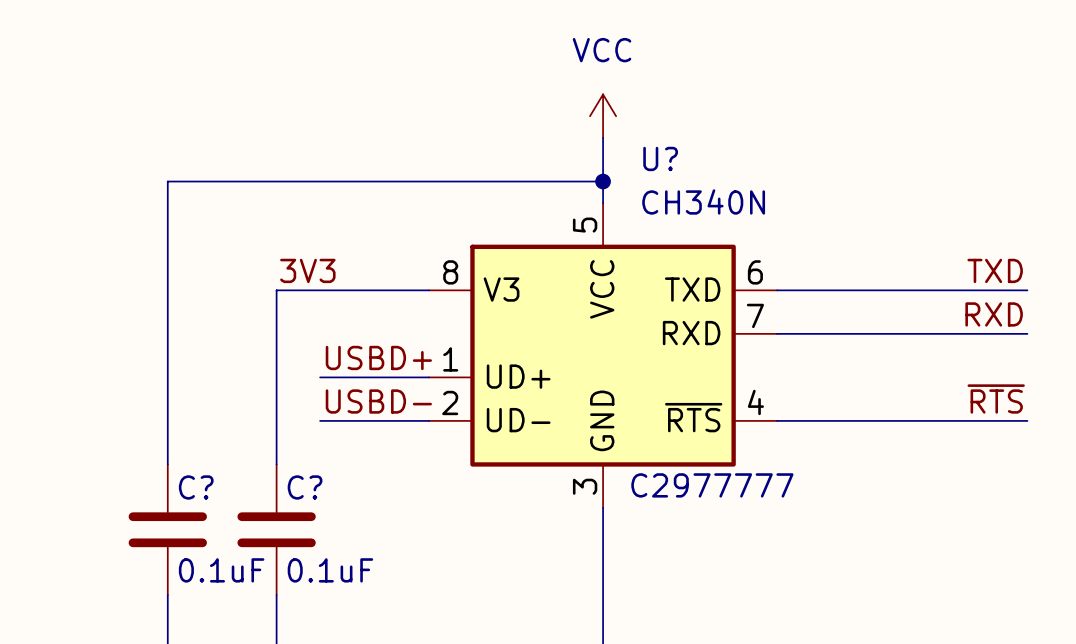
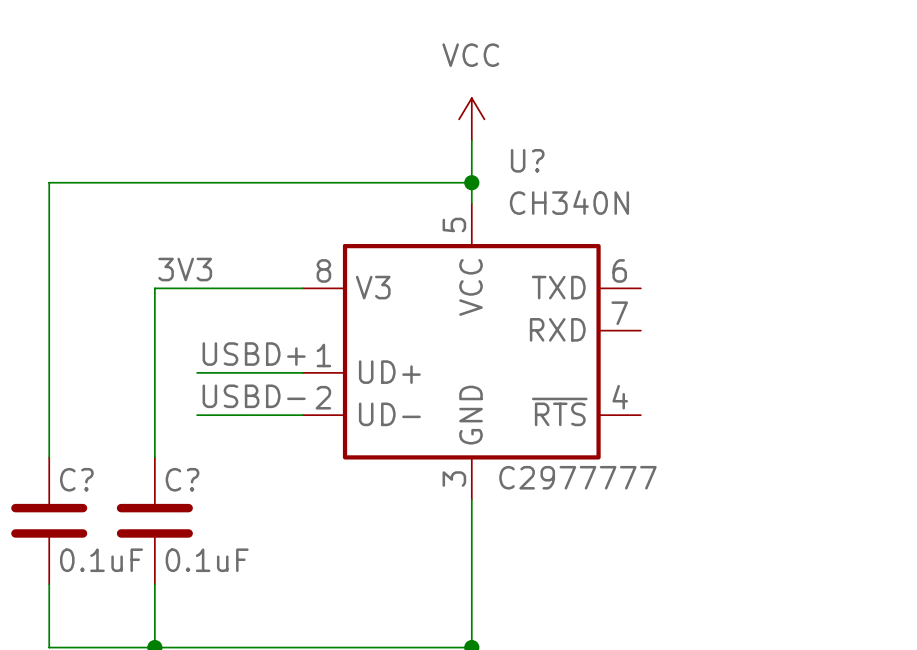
label: TXD (995, 270) -> none
wire: (777, 290) (1027, 290) -> none
label: RXD (994, 314) -> none
wire: (777, 333) (1027, 333) -> none
label: ~{RTS} (996, 399) -> none
wire: (777, 420) (1027, 420) -> none

